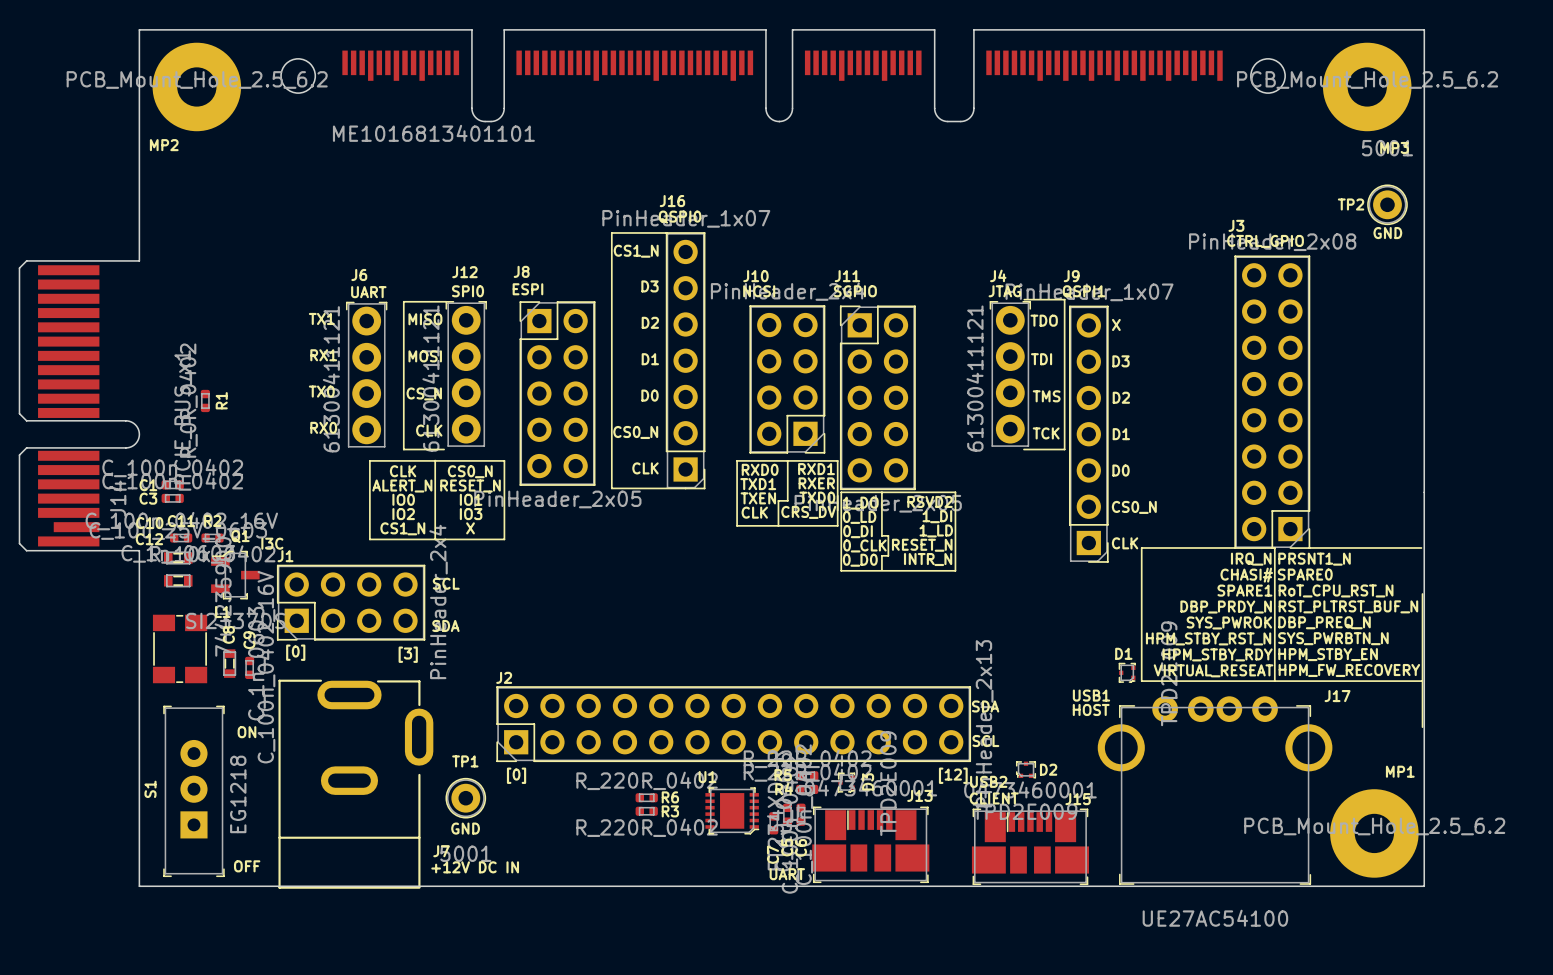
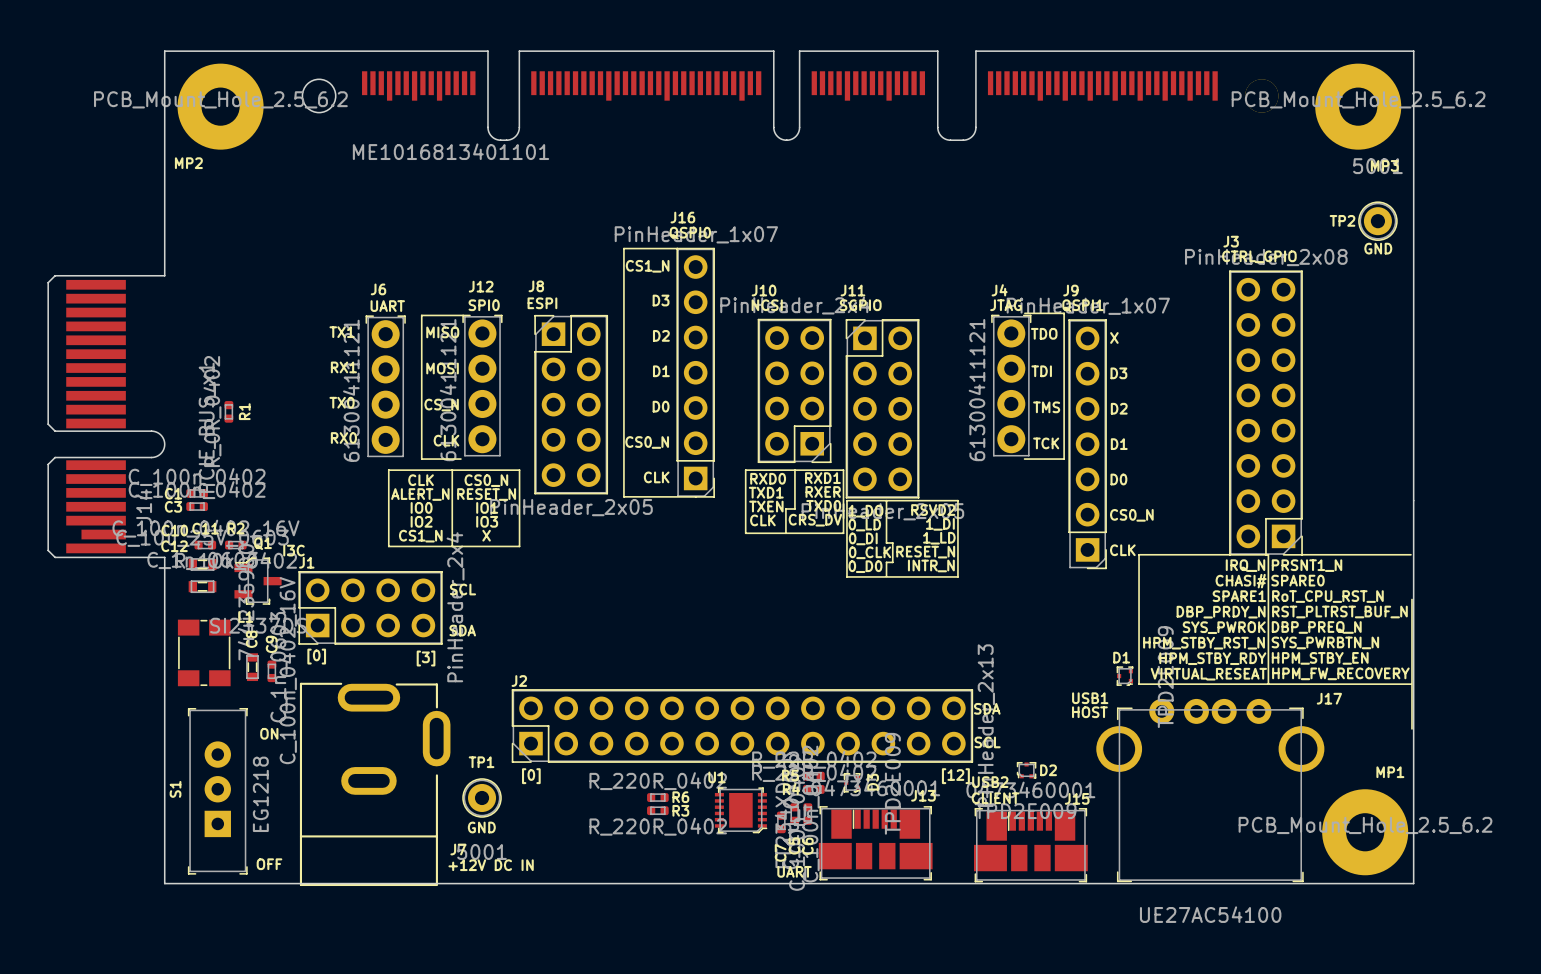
part footprint: [281, 50, 1286, 94] -> [302, 71, 1279, 113]

